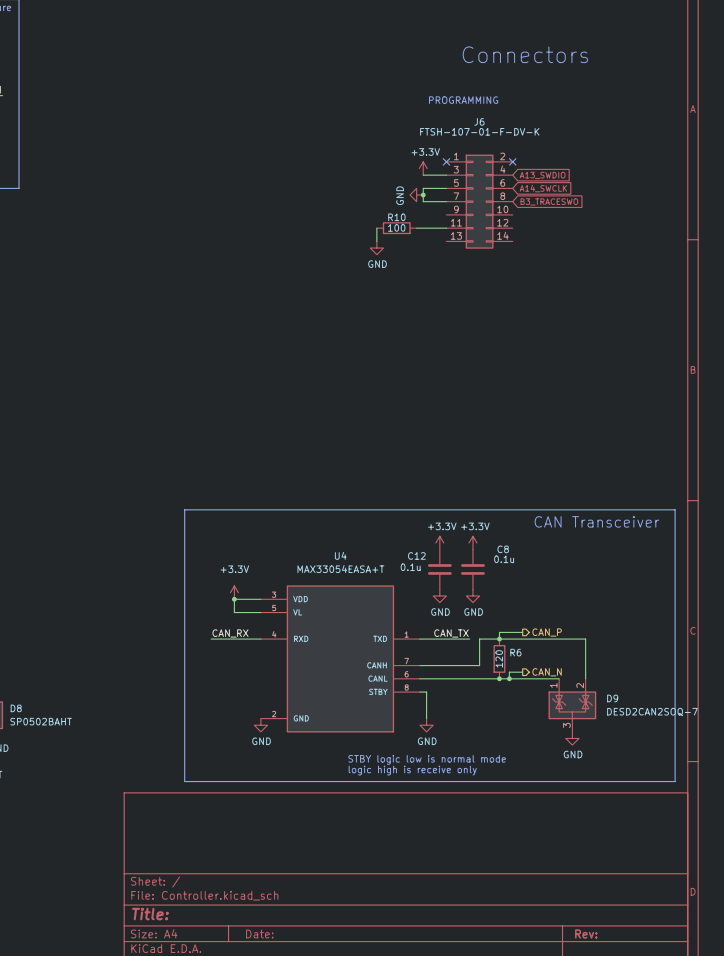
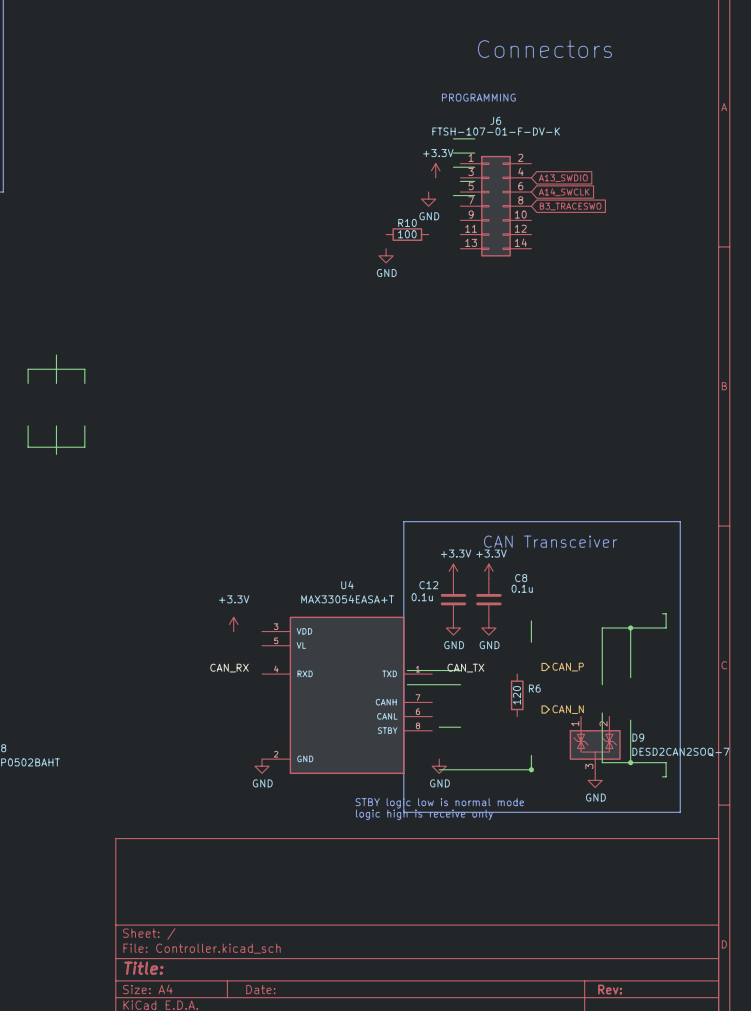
wire: none -> (453, 138) (474, 138)
wire: none -> (453, 153) (474, 153)
no-connect mark: (446, 161) -> none
no-connect mark: (512, 161) -> none
wire: none -> (453, 167) (474, 167)
wire: (423, 175) (446, 175) -> none
wire: none -> (460, 181) (474, 181)
wire: (446, 188) (423, 188) (423, 201) (446, 201) -> none
wire: none -> (453, 195) (474, 195)
power symbol rotation: 0° (416, 195) -> 90° counterclockwise (428, 199)
junction: (423, 195) -> none
wire: (376, 228) (376, 241) -> none
wire: (416, 228) (446, 228) -> none
wire: none -> (56, 355) (56, 383)
wire: none -> (28, 383) (28, 369) (84, 369) (84, 383)
wire: none -> (28, 425) (28, 447) (84, 447) (84, 425)
wire: none -> (56, 425) (56, 454)
line: none -> (403, 521) (680, 521) (680, 812) (403, 812) (403, 521)
line: (184, 509) (675, 509) (675, 781) (184, 781) (184, 509) -> none
text position: CAN Transceiver (596, 521) -> CAN Transceiver (550, 541)
wire: none -> (662, 613) (666, 613) (666, 627) (602, 627) (602, 684)
wire: none -> (531, 620) (531, 642)
wire: none -> (630, 627) (630, 677)
junction: none -> (630, 627)
junction: (234, 599) -> none
wire: (260, 599) (234, 599) (234, 612) (260, 612) -> none
wire: (522, 632) (499, 632) (499, 639) -> none
wire: (211, 639) (260, 639) -> none
wire: (419, 639) (469, 639) -> (407, 670) (460, 670)
junction: (499, 639) -> none
wire: none -> (407, 684) (460, 684)
wire: (419, 665) (479, 665) (479, 639) (585, 639) (585, 678) -> none
wire: (522, 672) (509, 672) (509, 678) -> none
wire: none -> (602, 713) (602, 762) (666, 762) (666, 776) (662, 776)
wire: (419, 678) (559, 678) -> none
junction: (499, 678) -> none
junction: (509, 678) -> none
wire: none -> (630, 720) (630, 762)
wire: none -> (439, 727) (460, 727)
wire: (419, 692) (426, 692) (426, 718) -> none
wire: none -> (531, 755) (531, 769) (439, 769)
junction: none -> (630, 762)
junction: none -> (531, 769)

